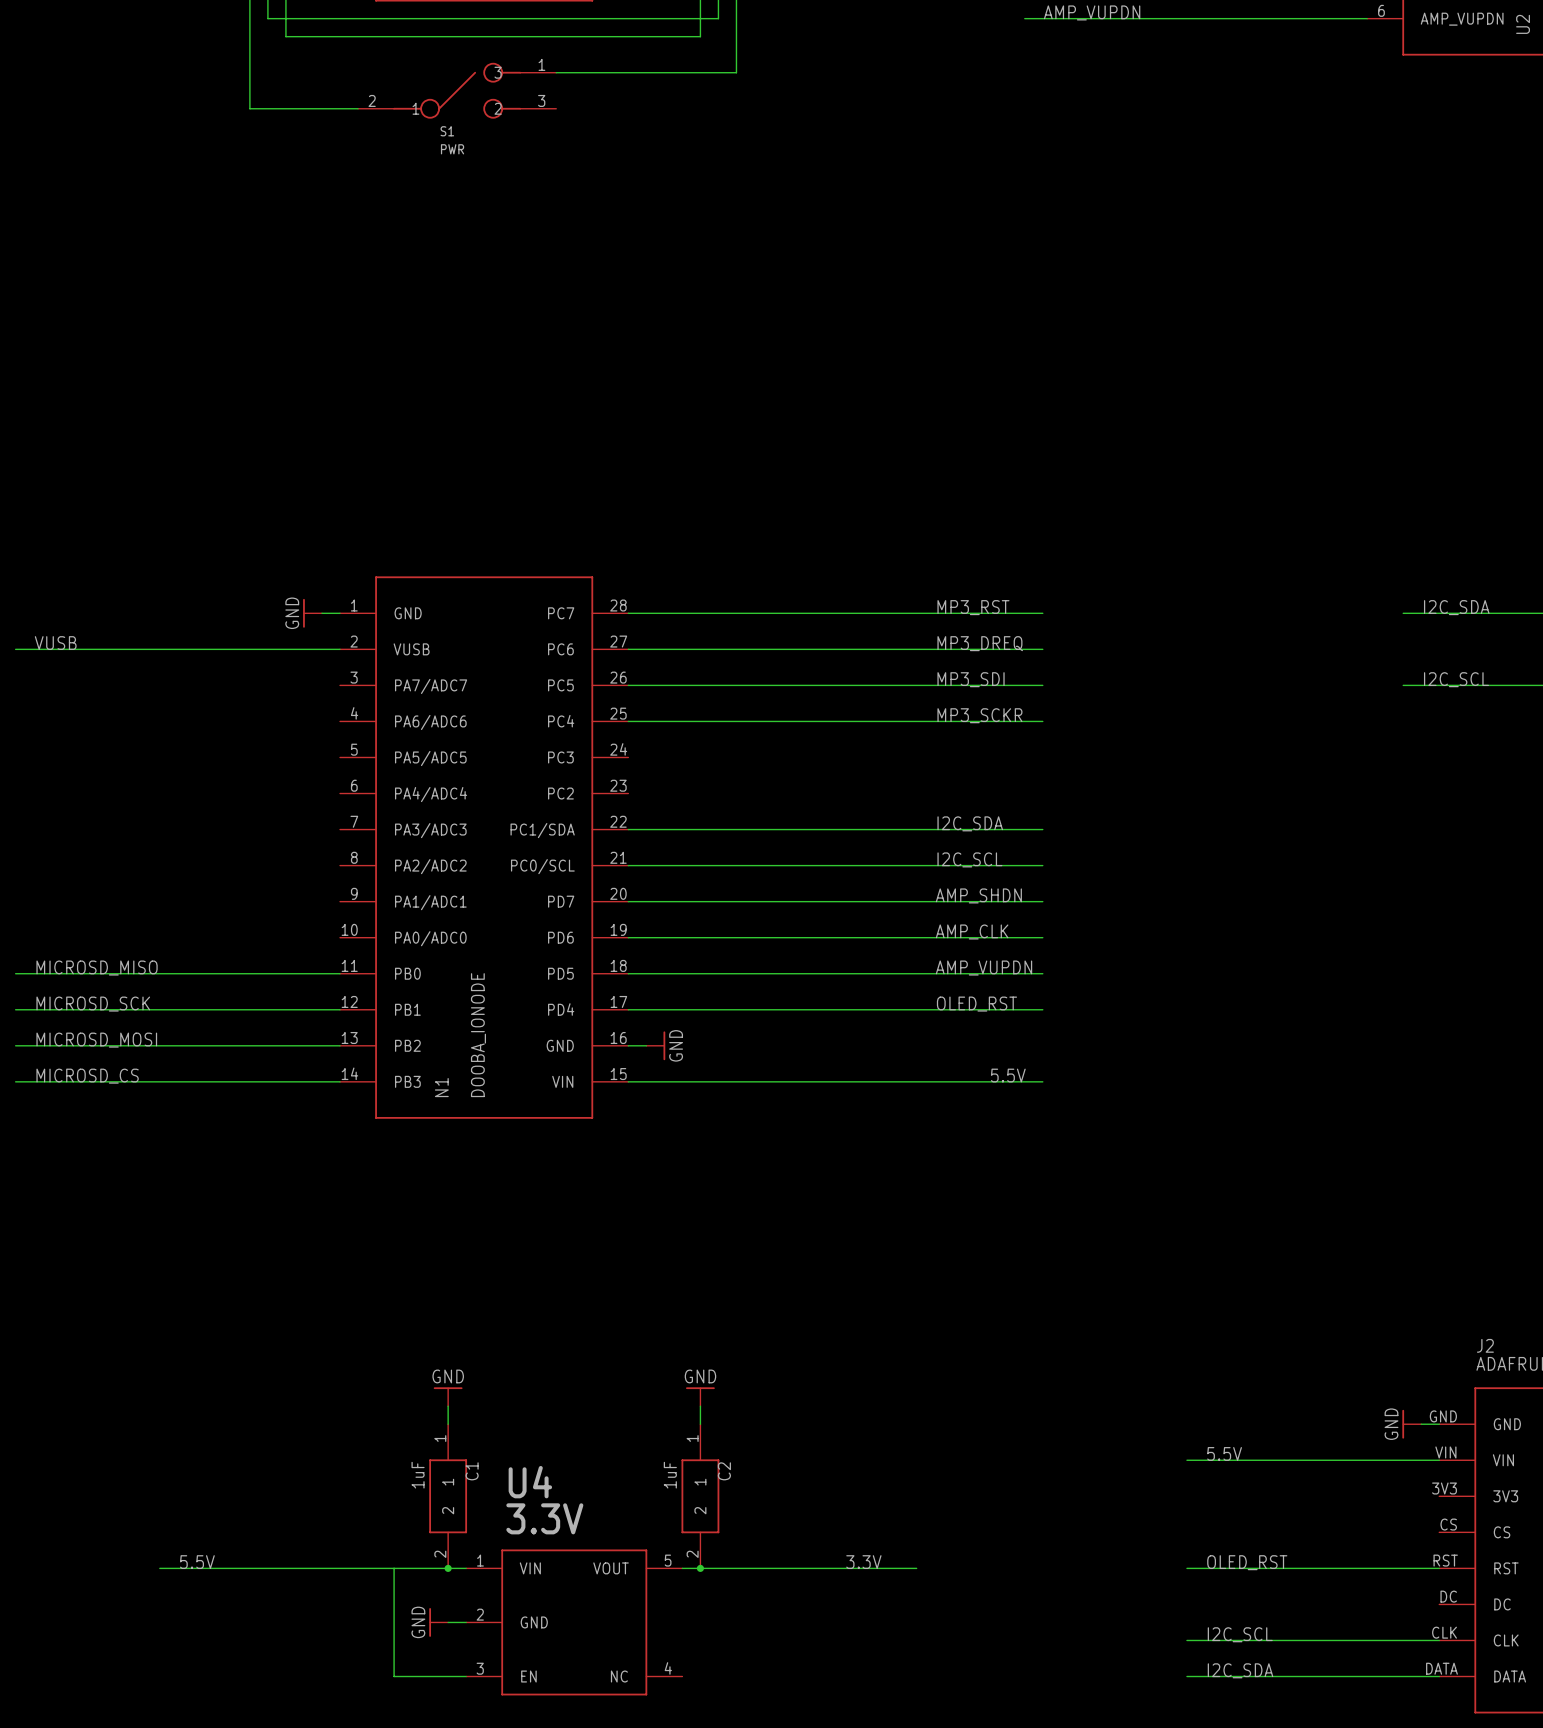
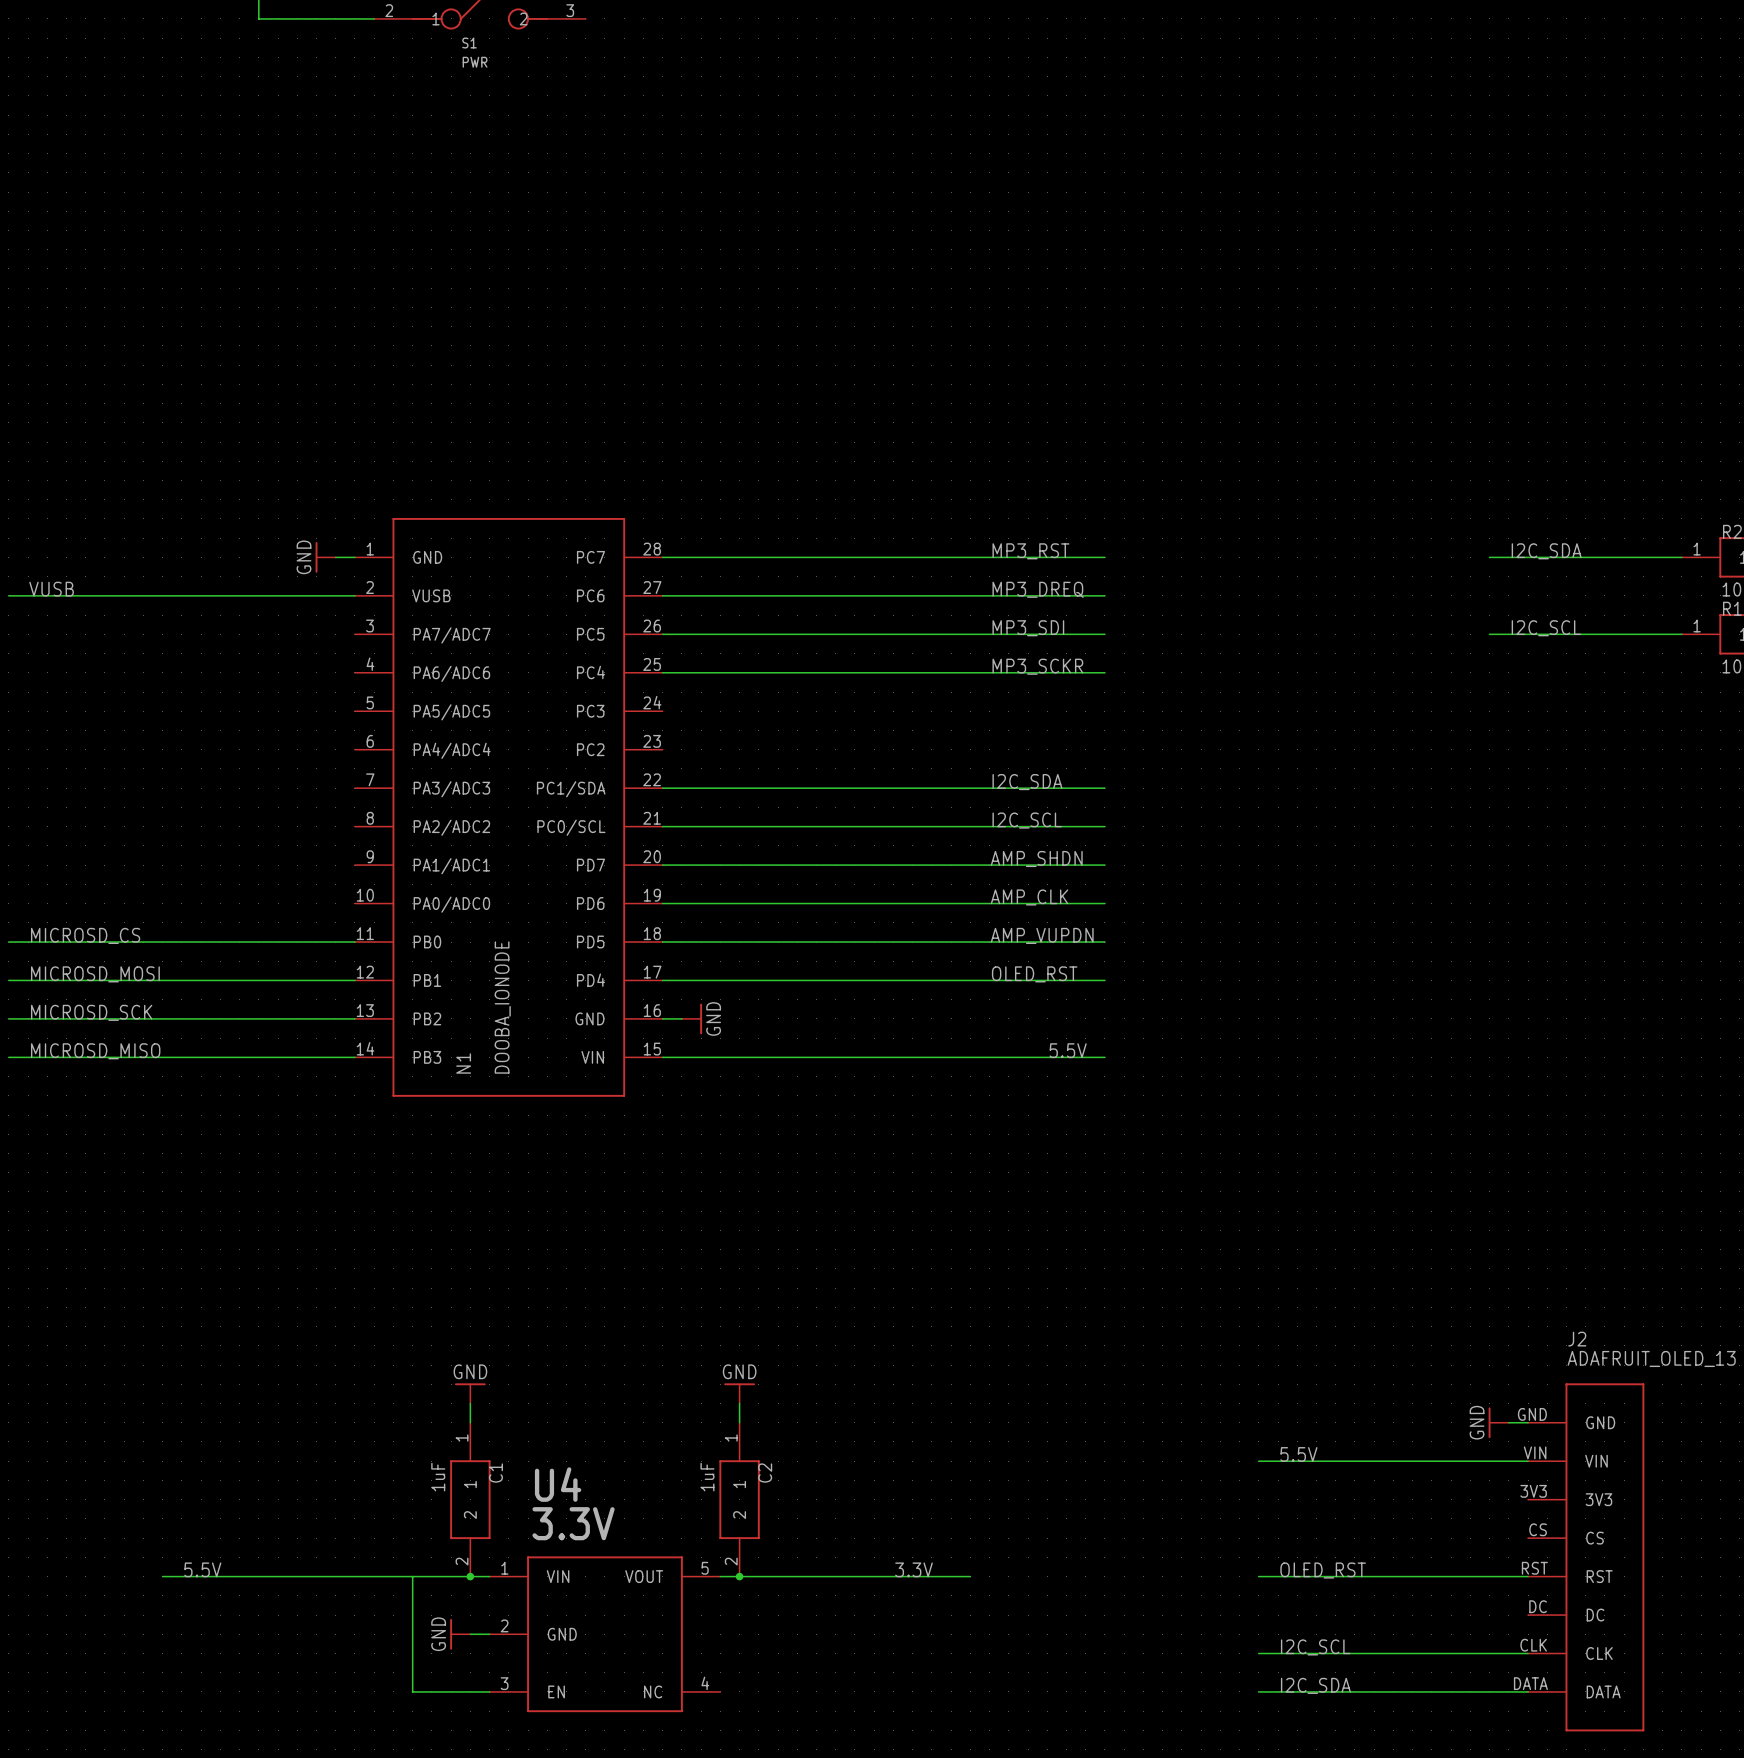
label: MICROSD_MISO (97, 968) -> MICROSD_CS (85, 935)
label: MICROSD_SCK (93, 1004) -> MICROSD_MOSI (95, 974)
label: MICROSD_MOSI (96, 1040) -> MICROSD_SCK (91, 1012)
label: MICROSD_CS (87, 1076) -> MICROSD_MISO (95, 1051)

